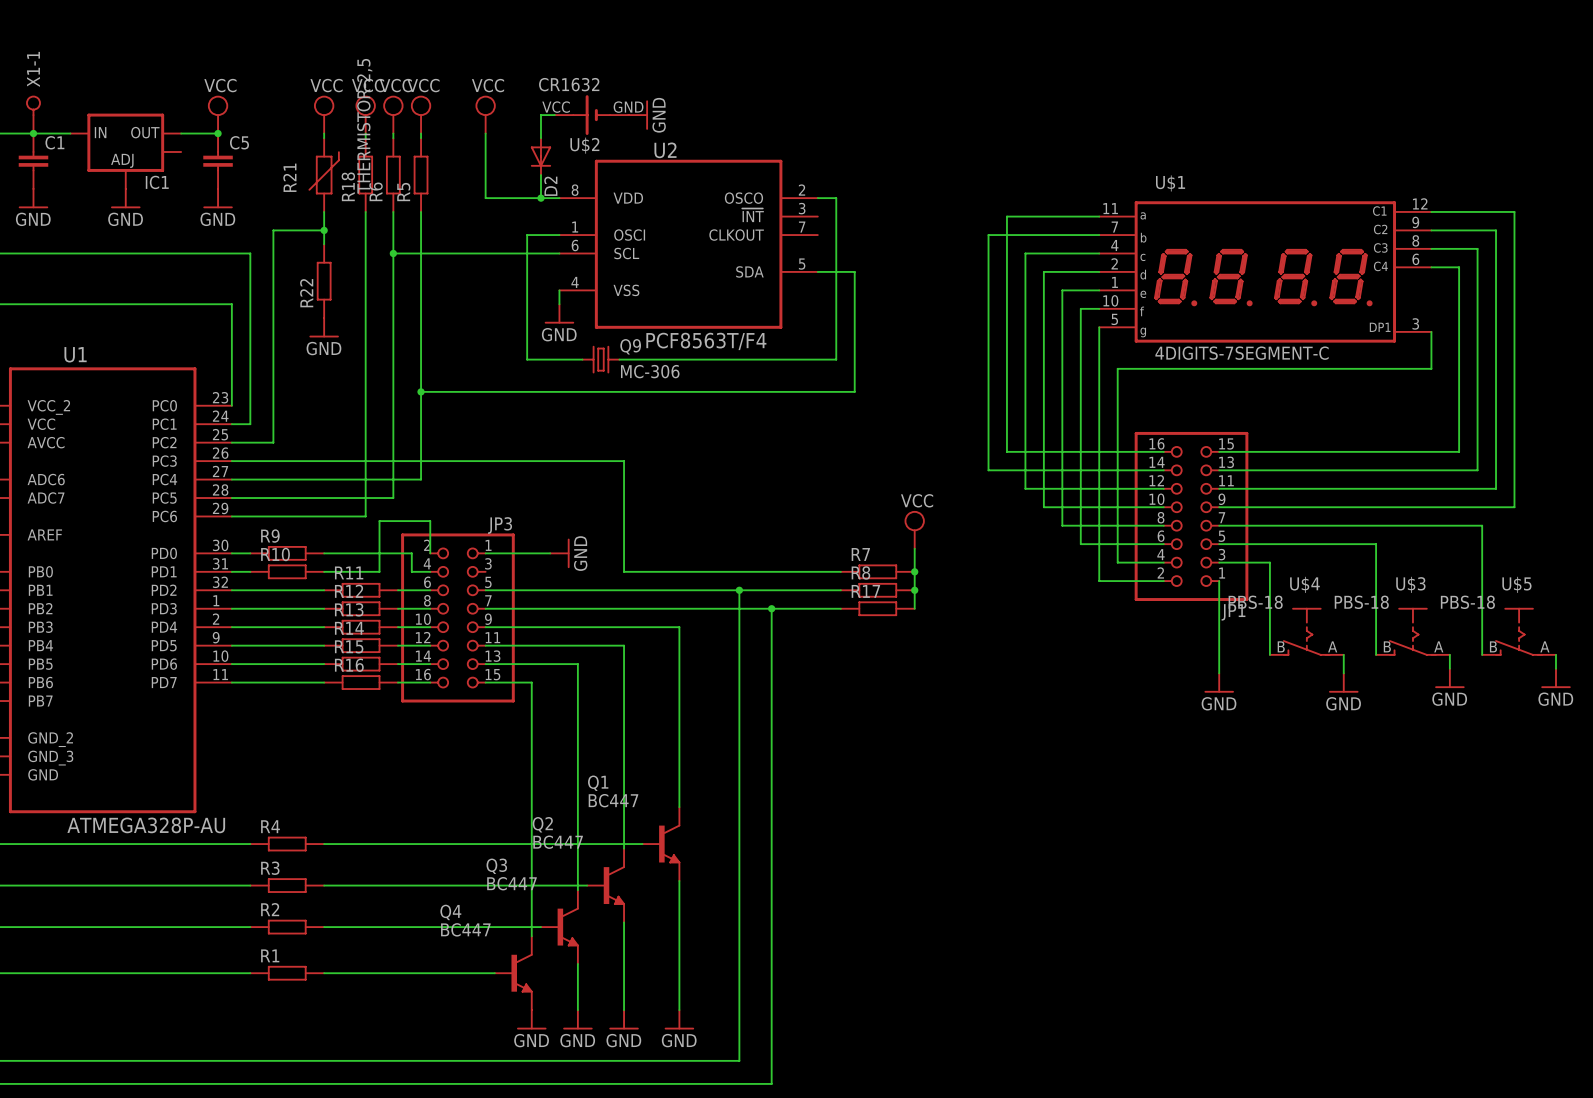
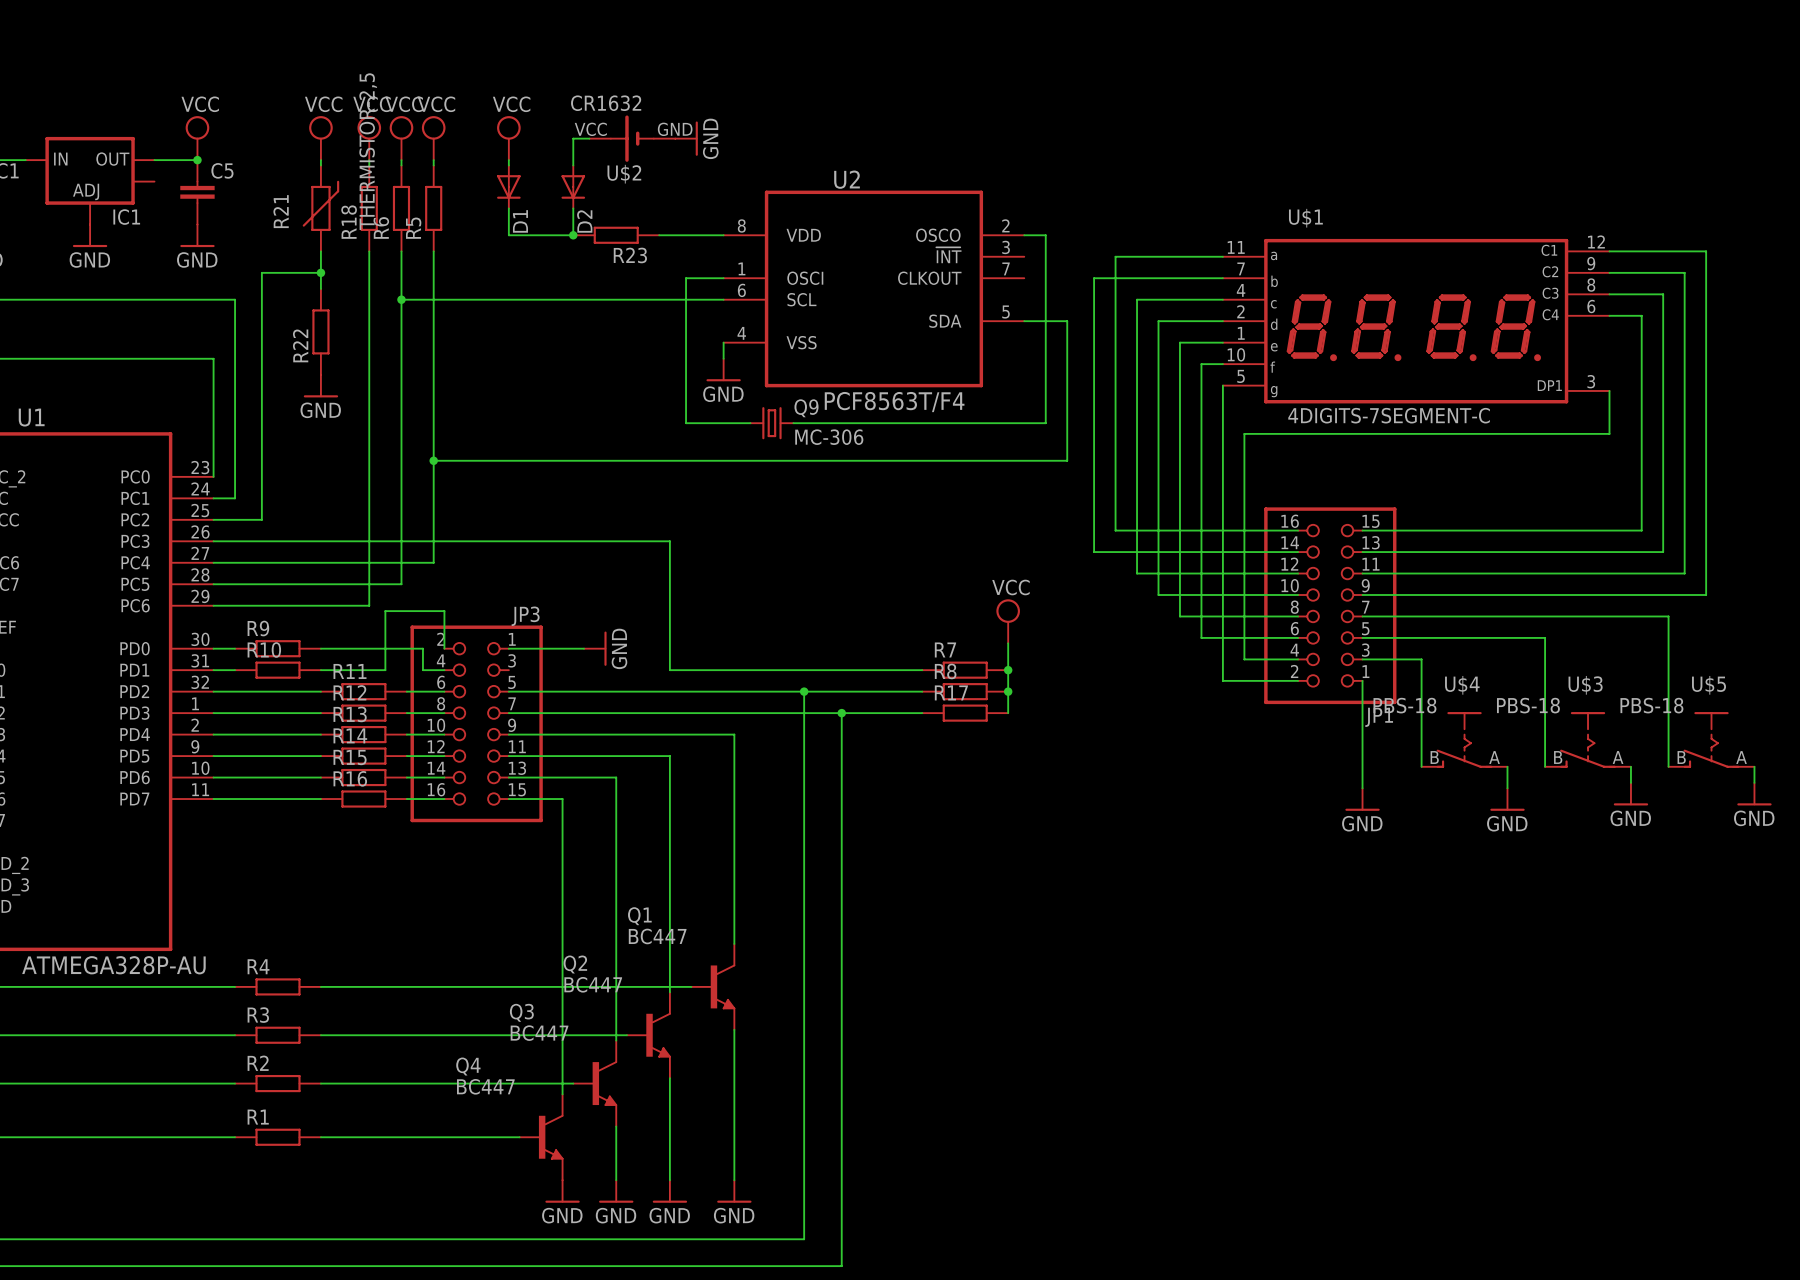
D1: none -> (508, 186)
R23: none -> (616, 235)
wire: none -> (659, 235) (723, 235)
wire: (817, 198) (836, 198) (836, 359) -> (1024, 235) (1045, 235) (1045, 423) (916, 423)
wire: (559, 235) (527, 235) (527, 359) (582, 359) -> none
U2 position: (688, 244) -> (873, 288)
wire: none -> (594, 299) (723, 299)
wire: (817, 271) (854, 271) (854, 391) -> (1024, 321) (1067, 321) (1067, 460) (938, 460)
wire: (559, 290) (559, 304) -> (723, 342) (723, 358)
power symbol position: GND (559, 313) -> GND (723, 370)
Q9 position: (600, 359) -> (771, 423)
wire: (619, 359) (637, 359) -> (723, 278) (686, 278) (686, 423)

